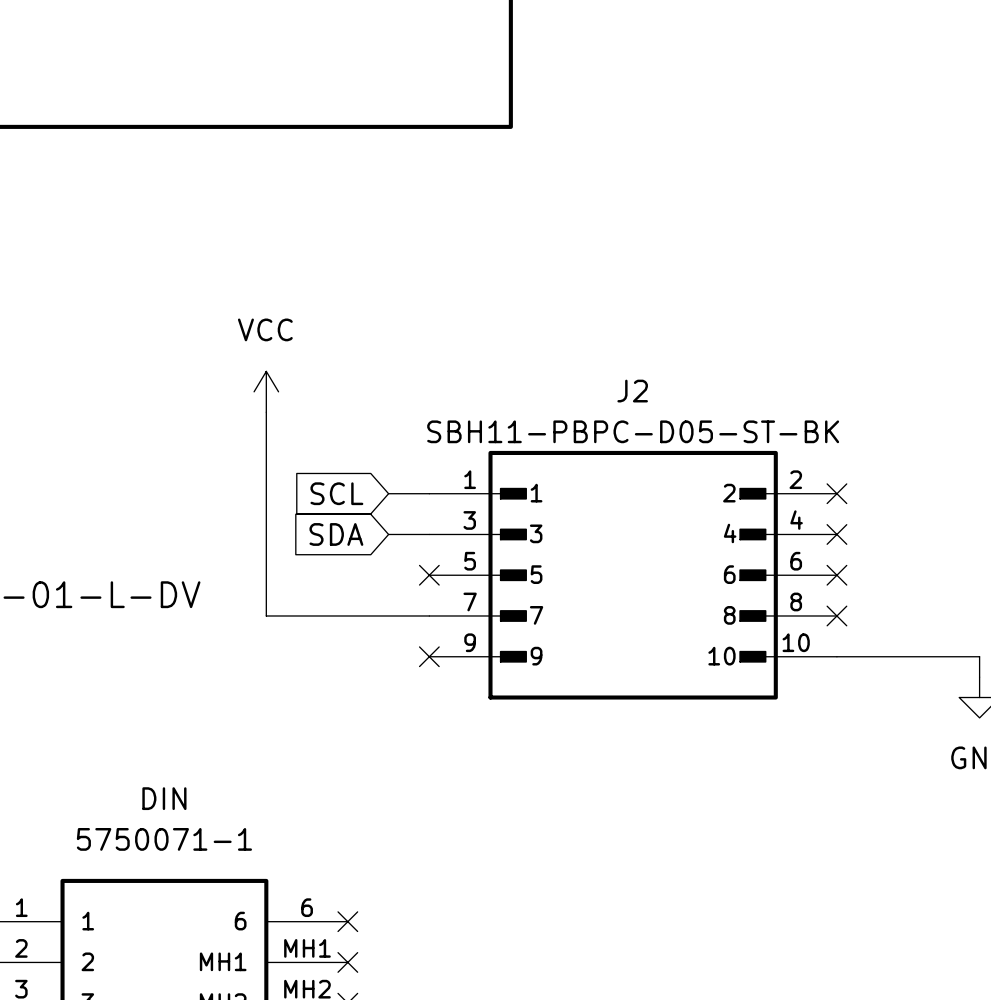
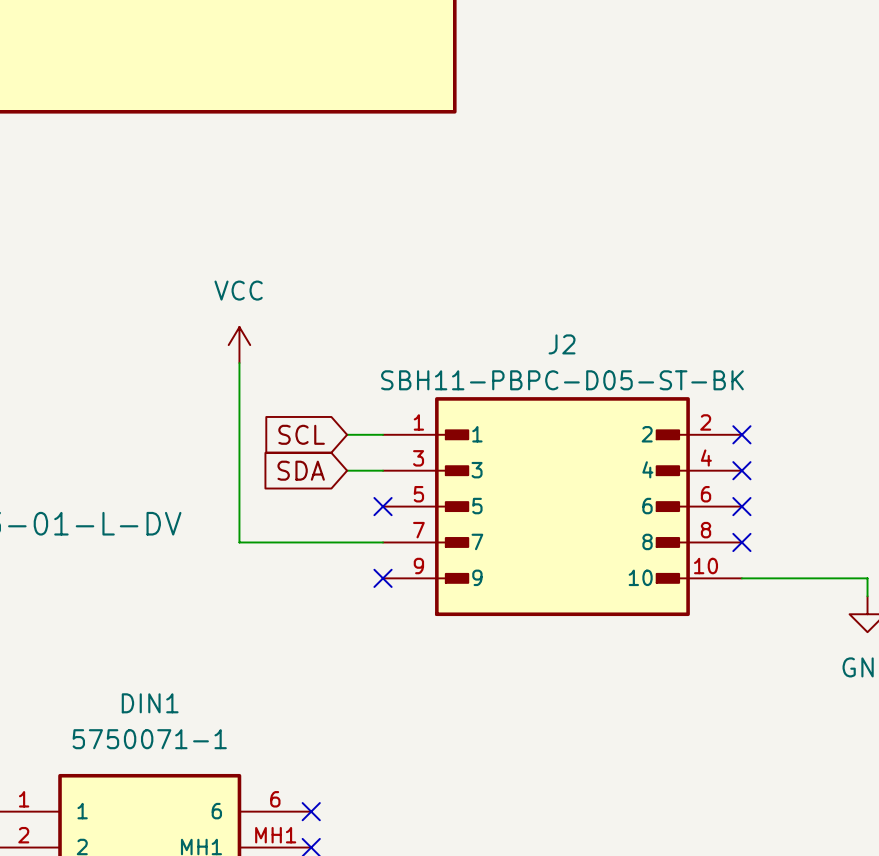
DIN name: DIN (164, 798) -> DIN1 (150, 703)

